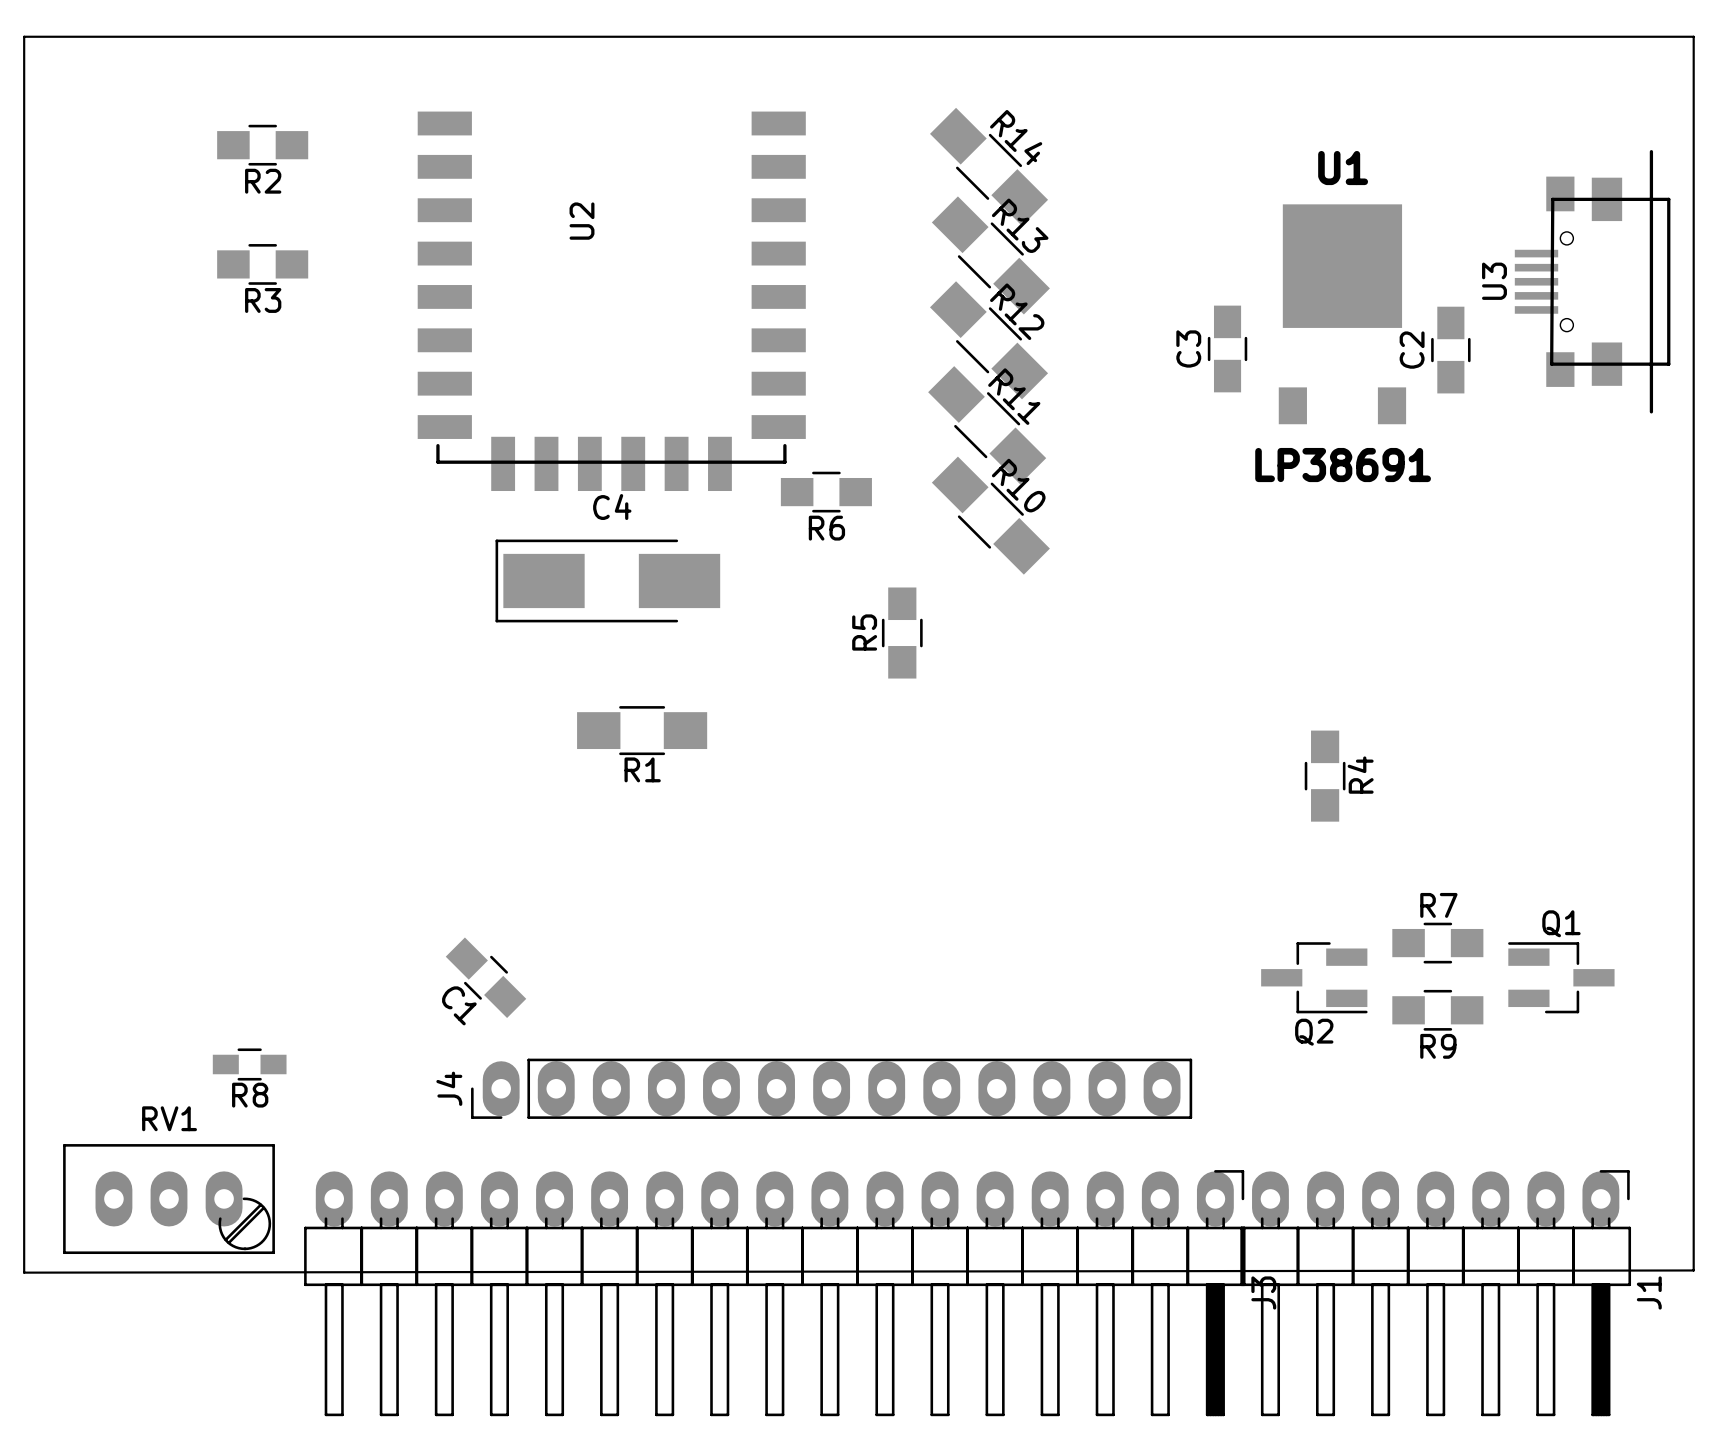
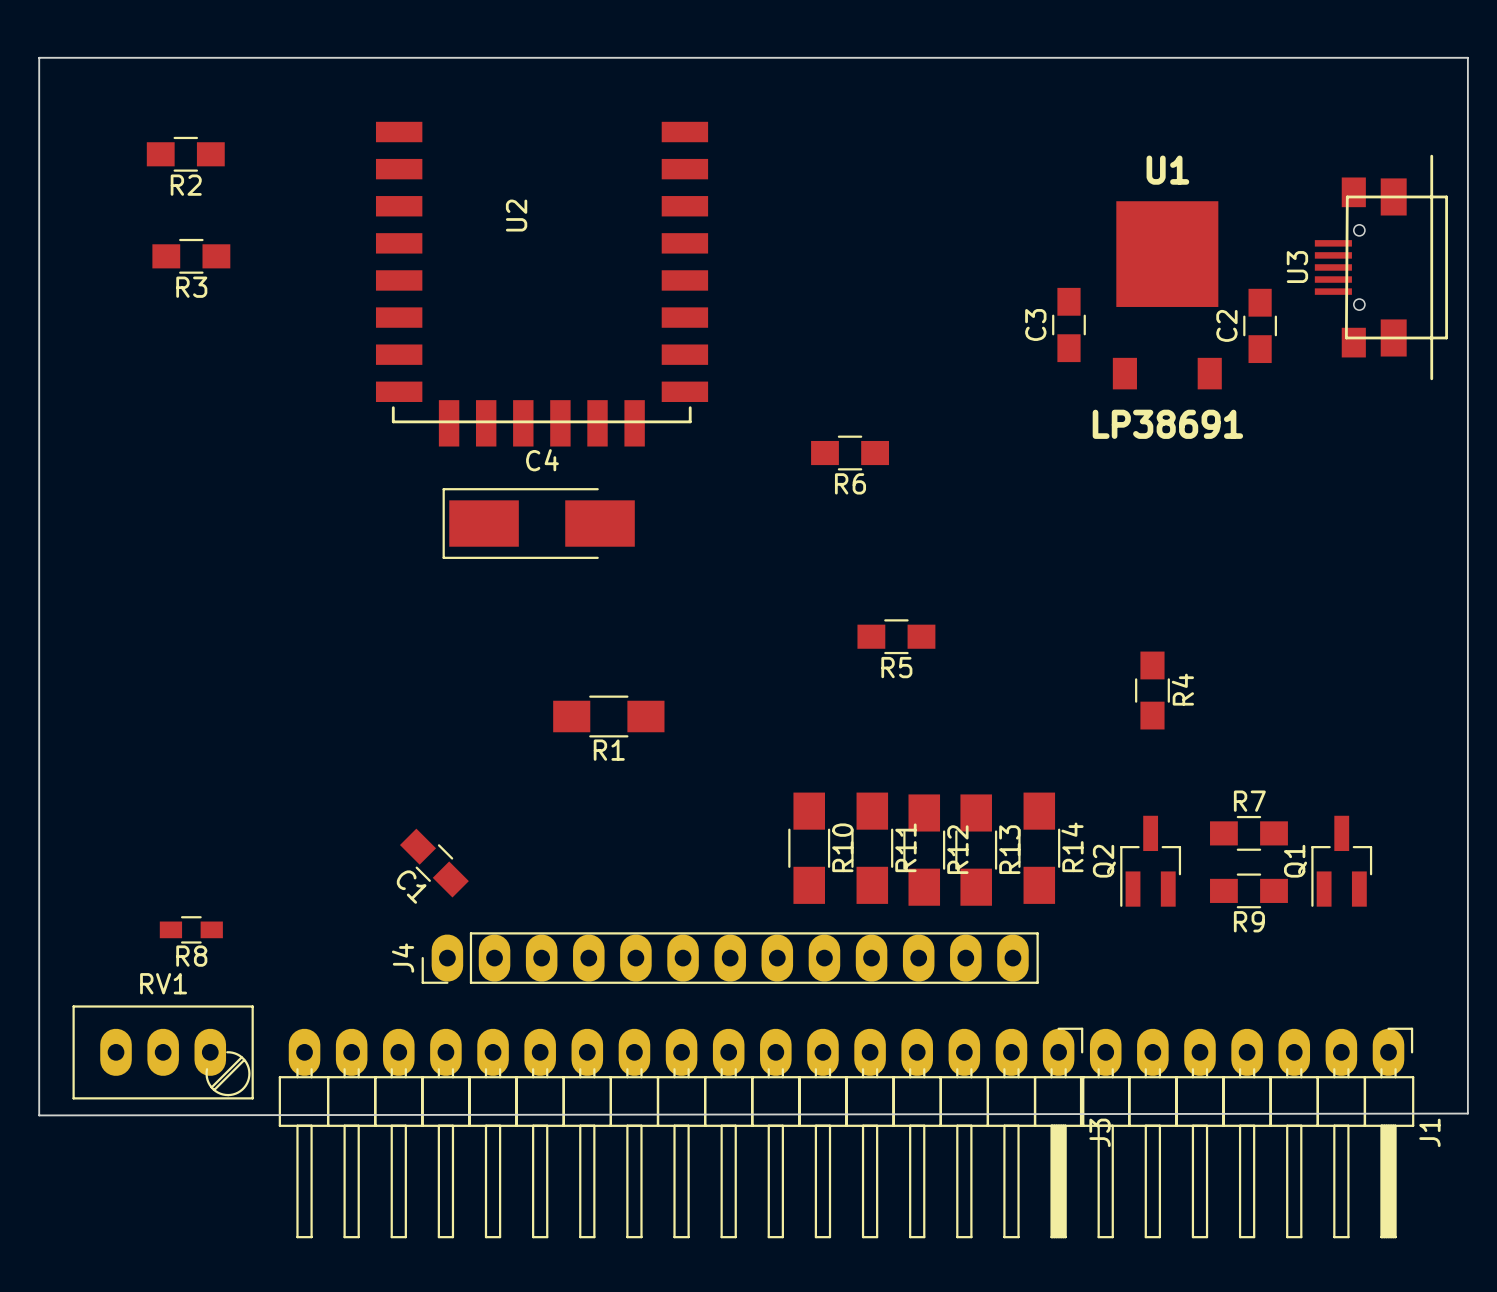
R2 position: (262, 145) -> (185, 154)
R14 rotation: 0° (989, 166) -> 45° clockwise (1039, 848)
R14 position: (989, 166) -> (1039, 848)
R13 rotation: 0° (990, 255) -> 45° clockwise (976, 850)
R13 position: (990, 255) -> (976, 850)
R3 position: (262, 264) -> (191, 256)
R12 rotation: 0° (989, 340) -> 45° clockwise (924, 850)
R12 position: (989, 340) -> (924, 850)
R11 rotation: 0° (987, 425) -> 45° clockwise (872, 848)
R11 position: (987, 425) -> (872, 848)
R6 position: (826, 492) -> (850, 453)
R10 rotation: 0° (990, 515) -> 45° clockwise (809, 848)
R10 position: (990, 515) -> (809, 848)
R5 name position: R5 (864, 632) -> R5 (896, 667)
R5 rotation: 0° (902, 633) -> 90° clockwise (896, 636)
R5 position: (902, 633) -> (896, 636)
R1 position: (642, 730) -> (608, 716)
Q2 rotation: 0° (1314, 977) -> 90° clockwise (1150, 861)
Q1 rotation: 0° (1561, 977) -> 90° counterclockwise (1341, 861)
R8 position: (249, 1064) -> (191, 929)

